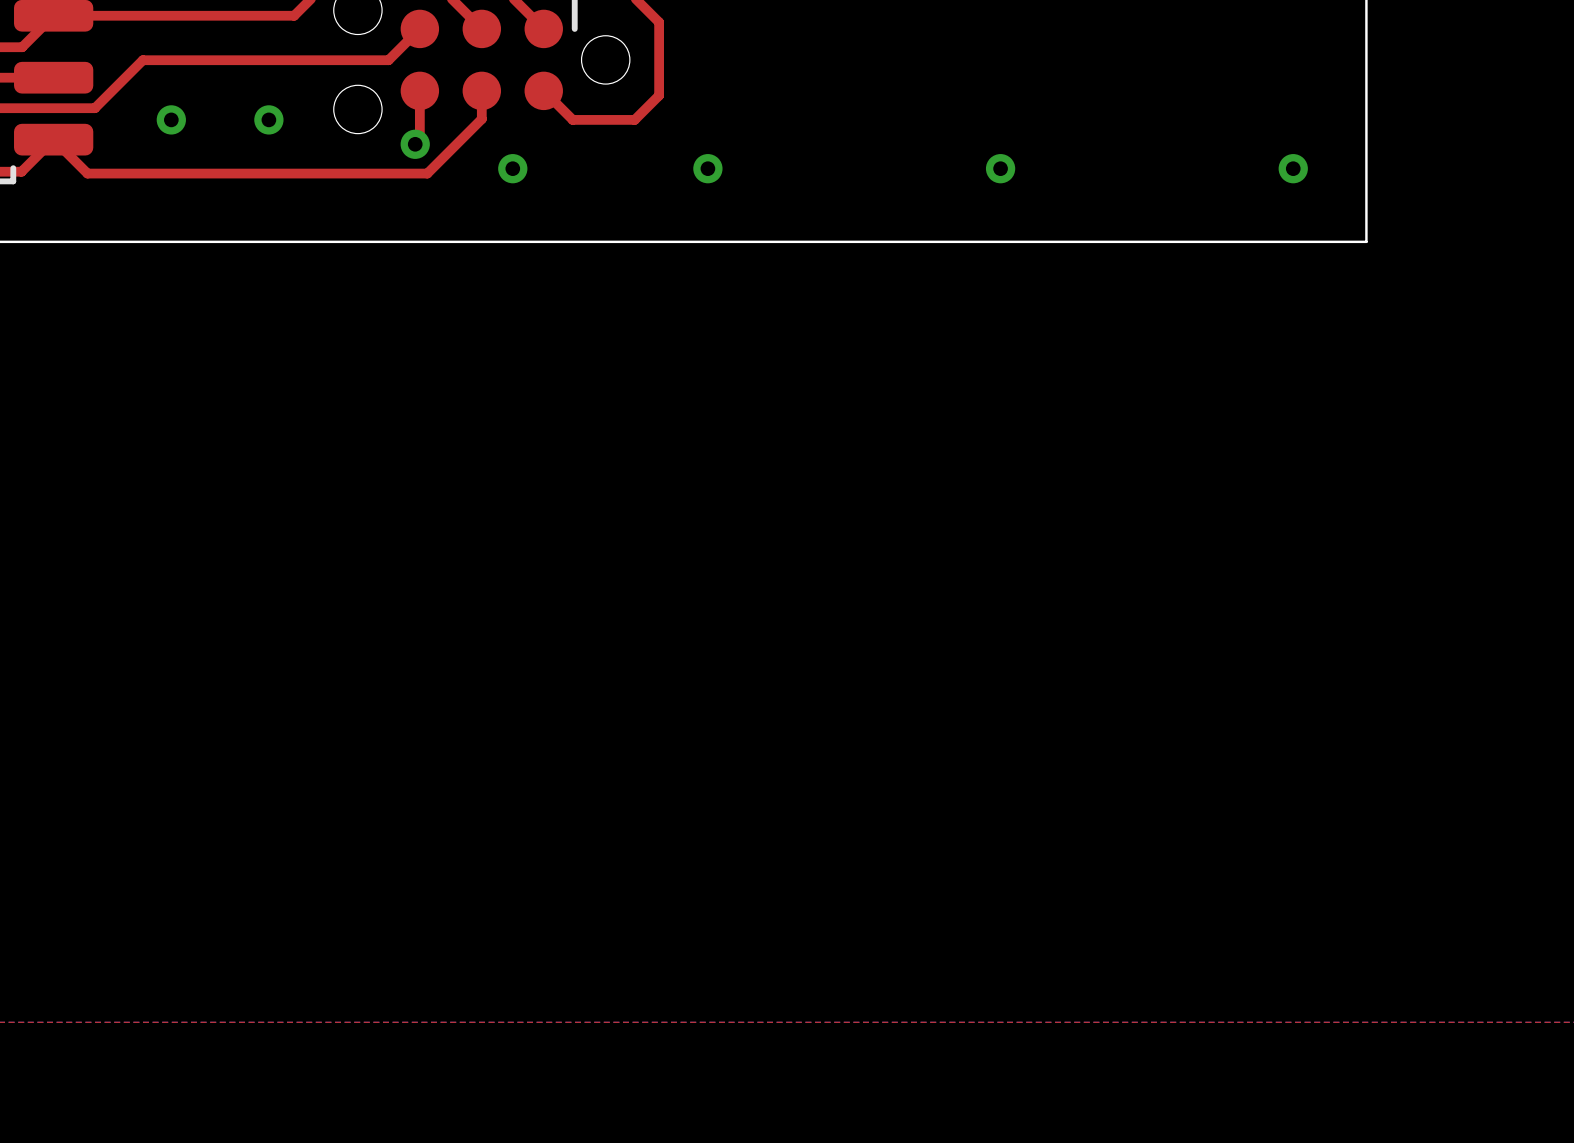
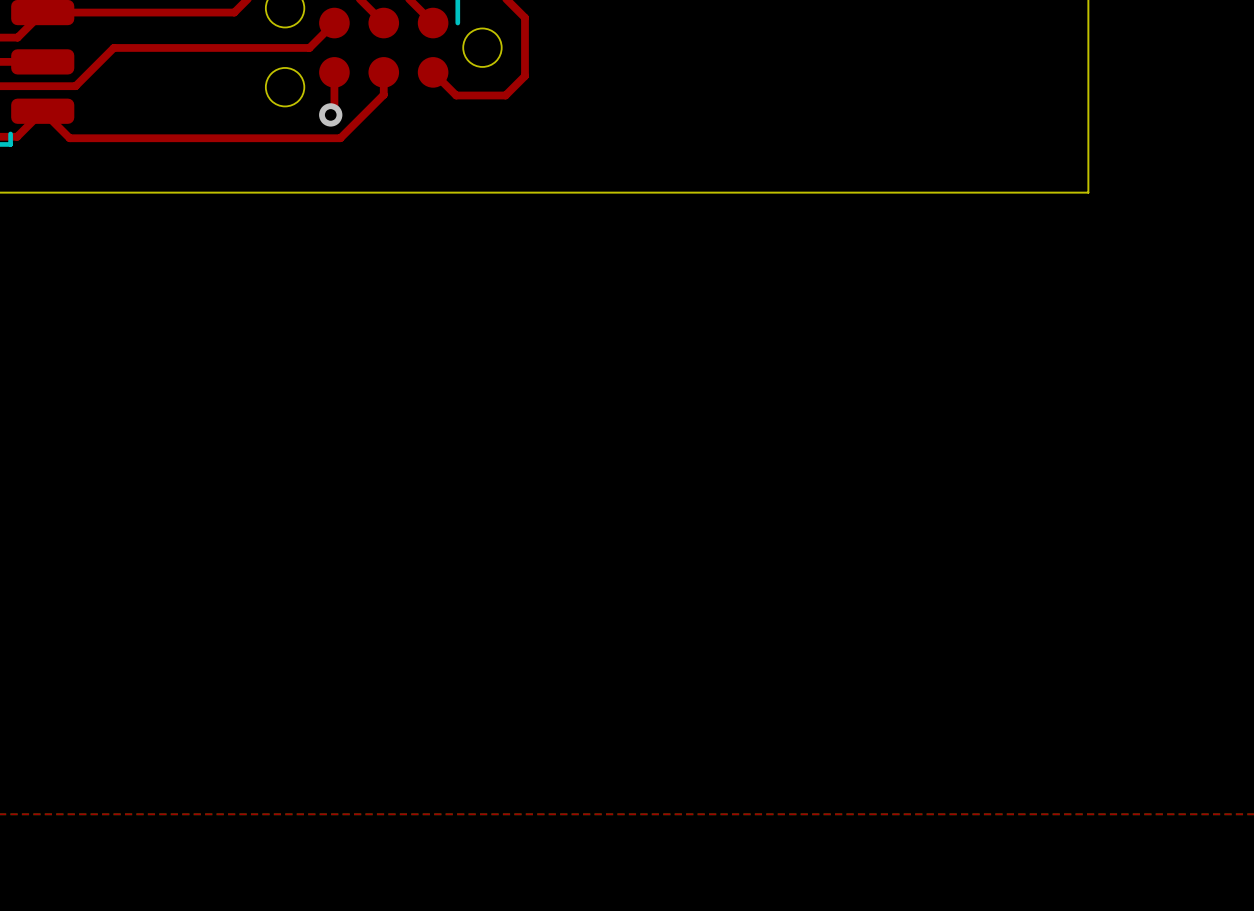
via: (171, 119) -> none
via: (268, 119) -> none
via: (512, 168) -> none
via: (707, 168) -> none
via: (1000, 168) -> none
via: (1293, 168) -> none

